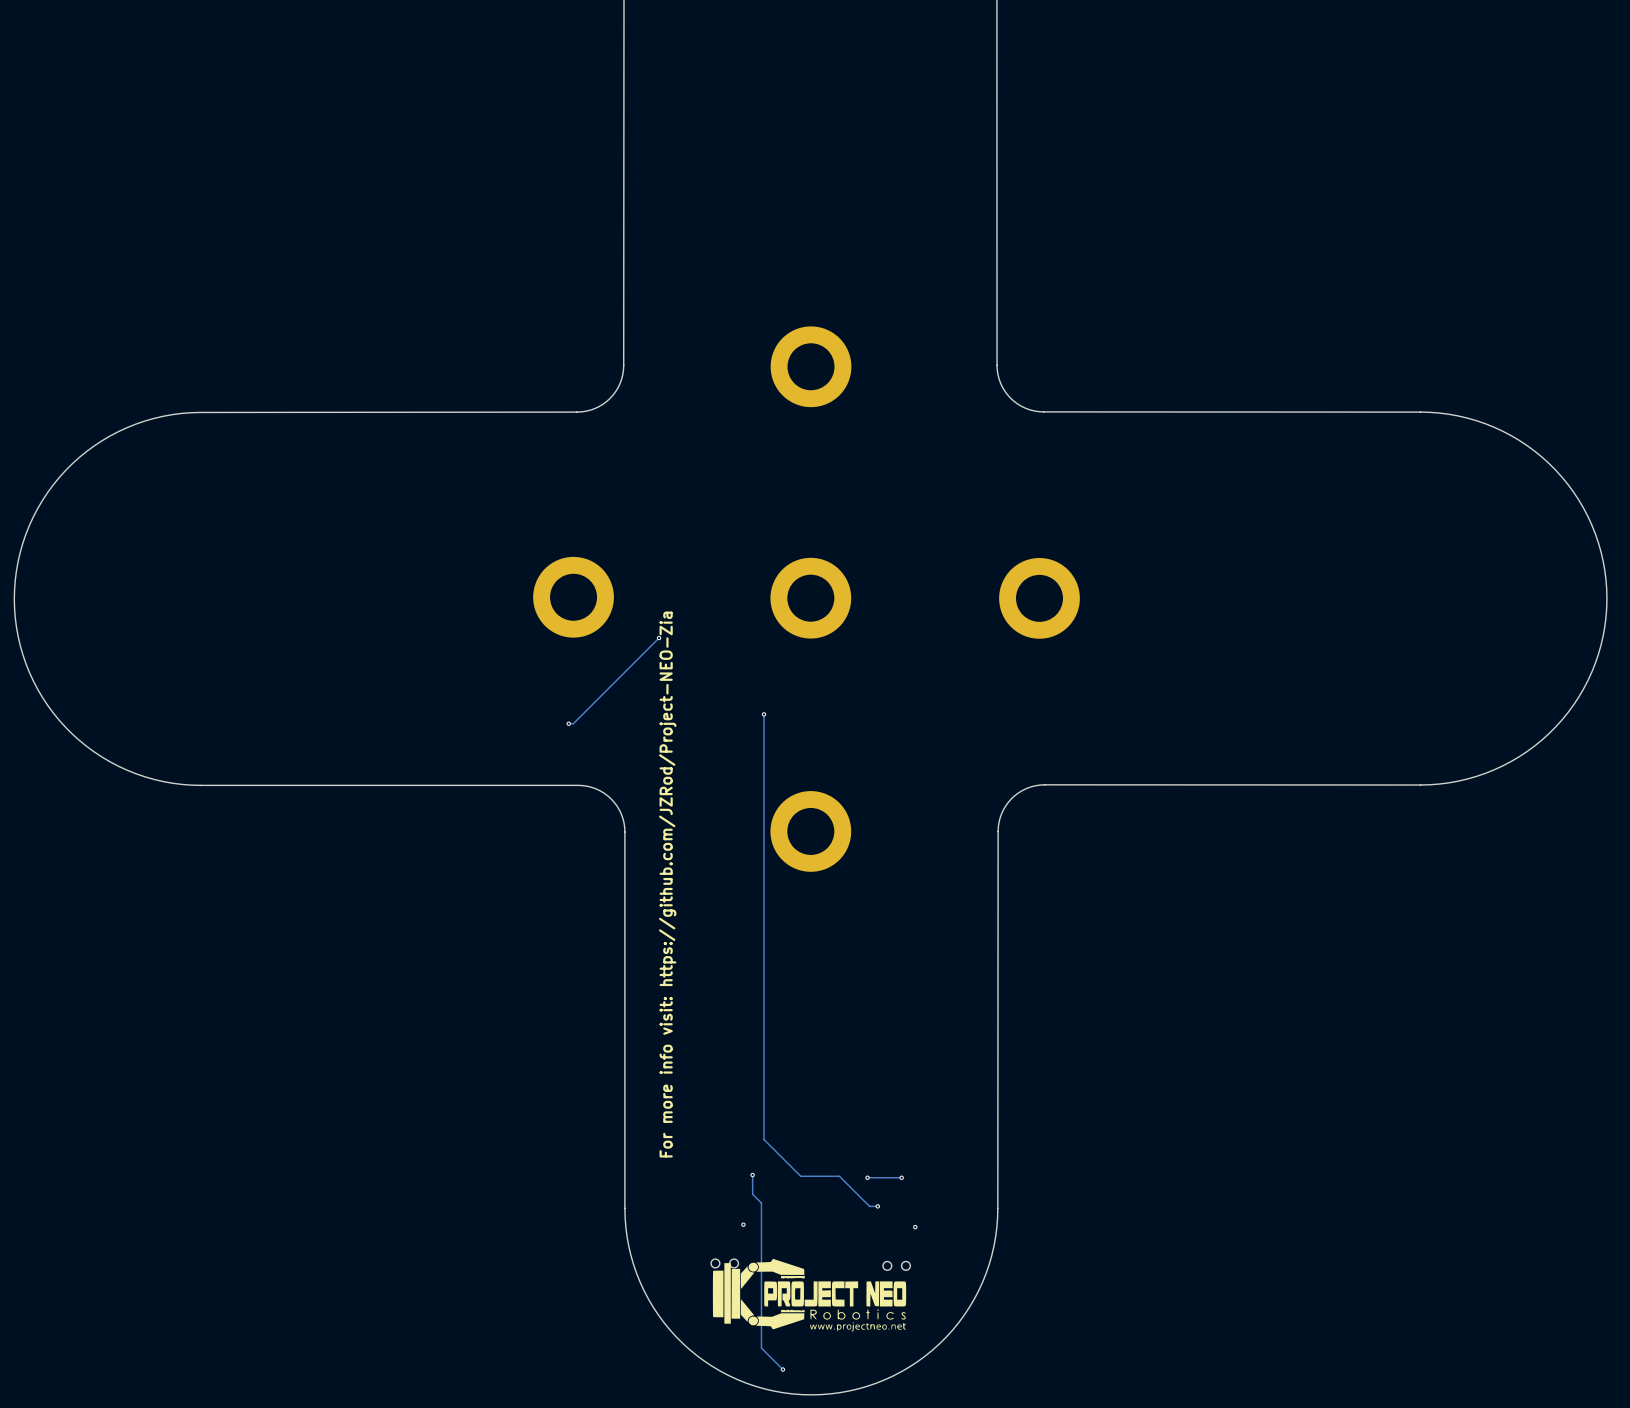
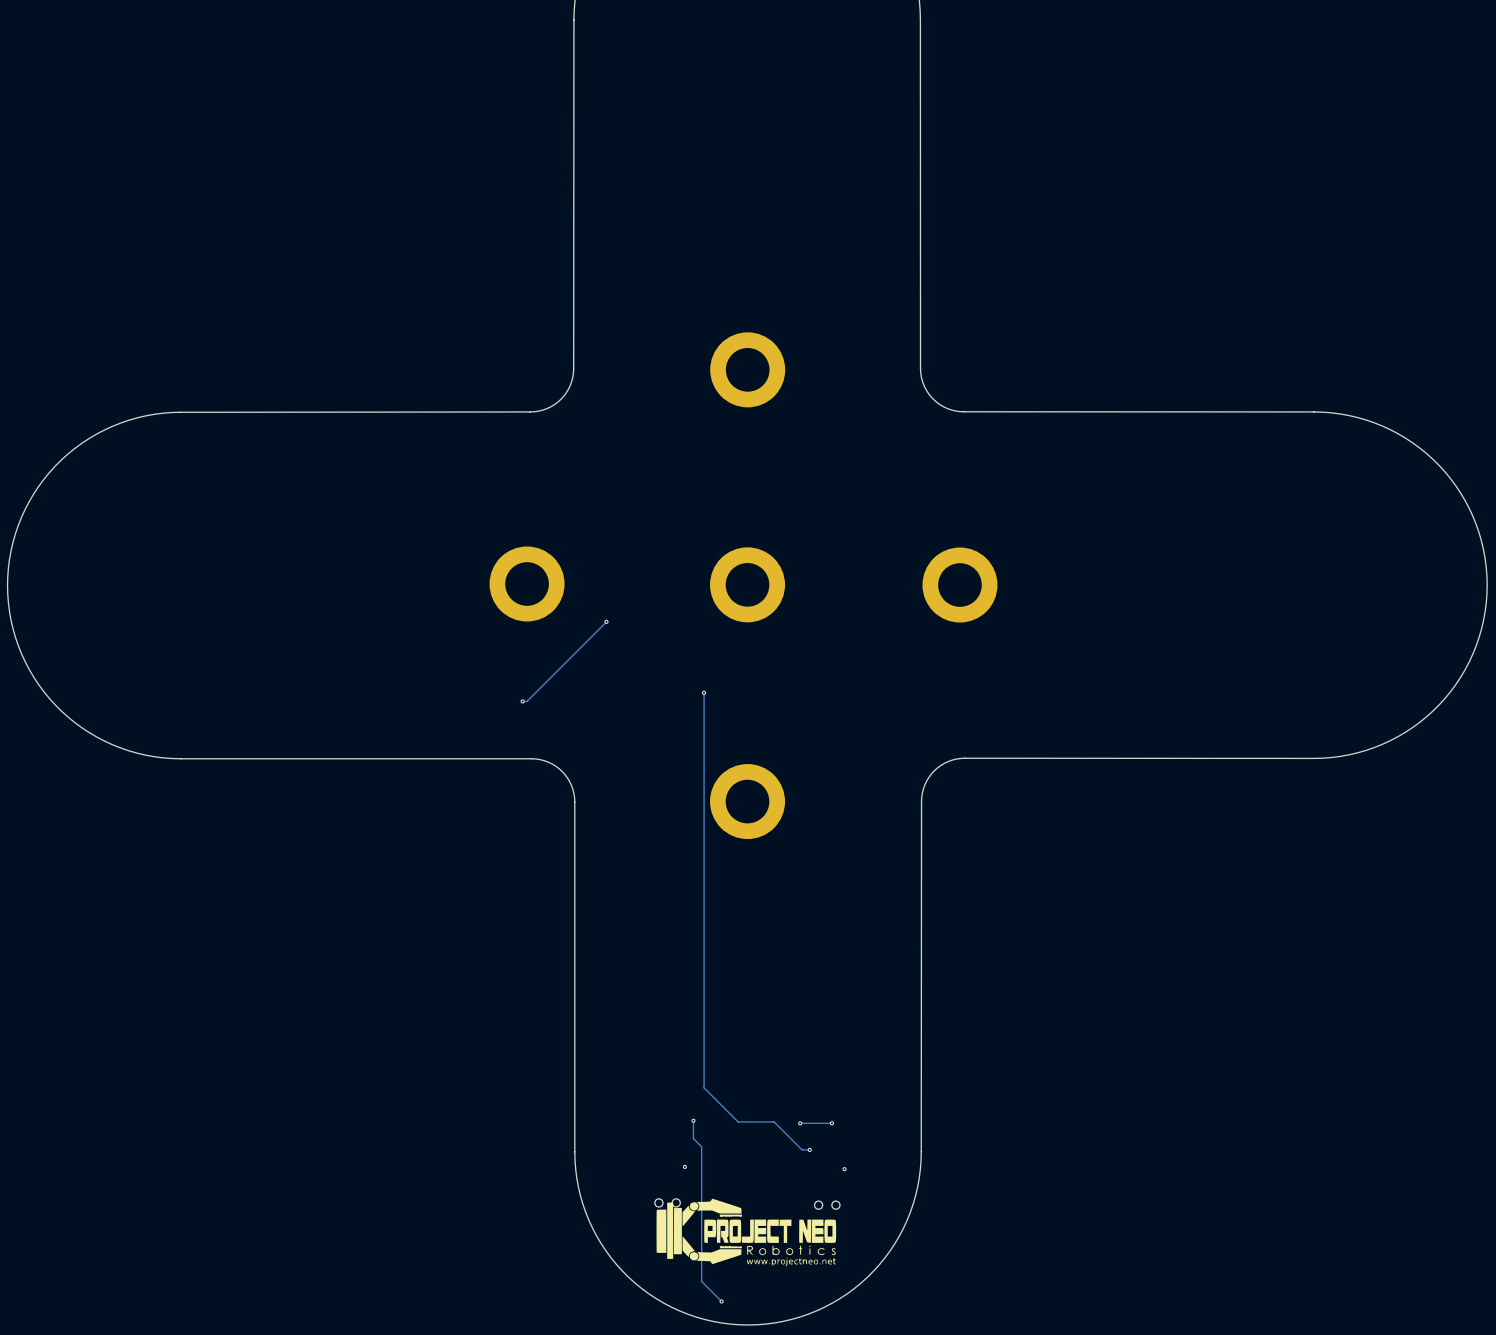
text: For more info visit: https://github.com/JZRod/Project-NEO-Zia (667, 884) -> none

